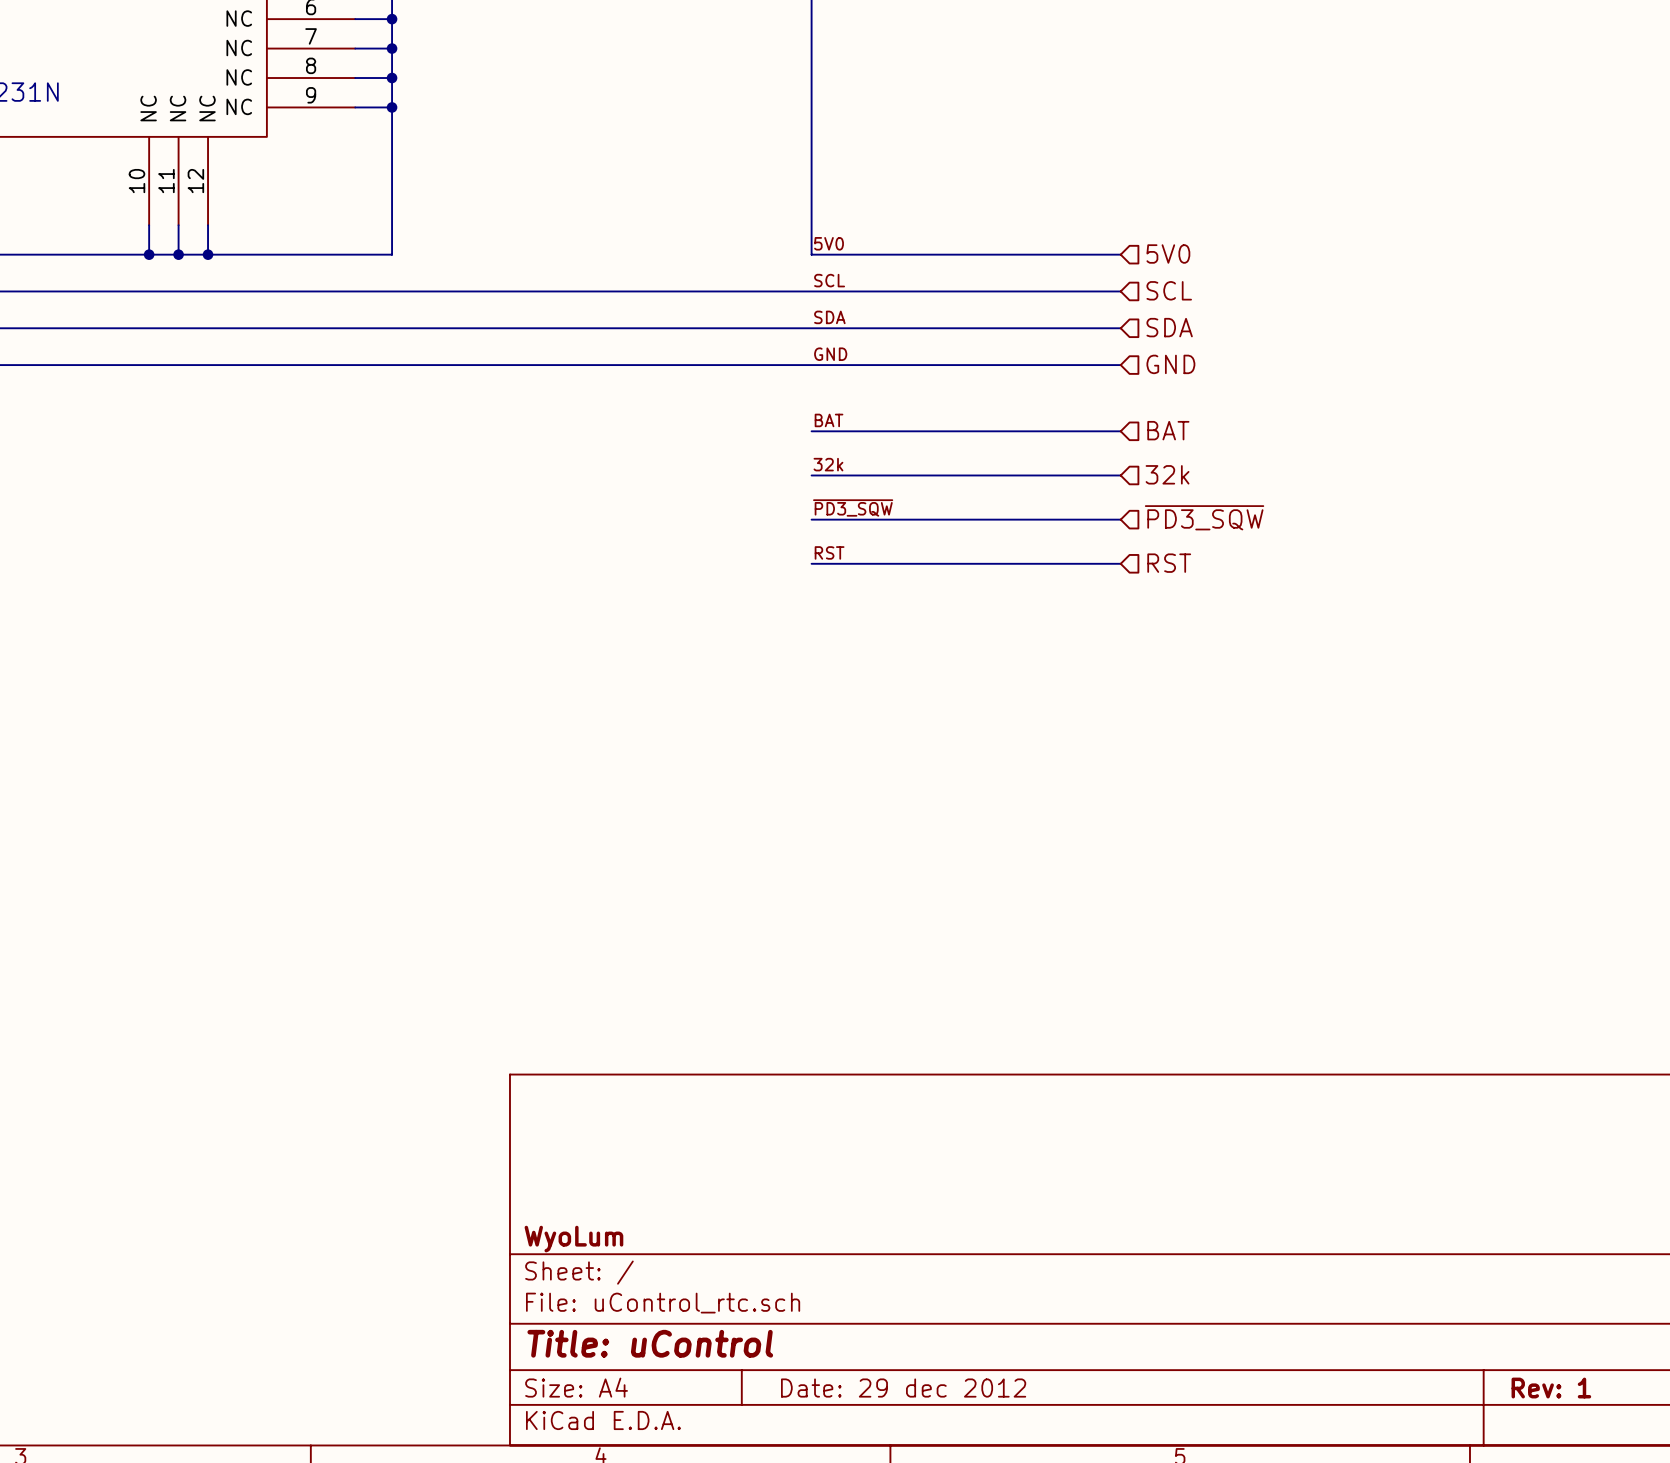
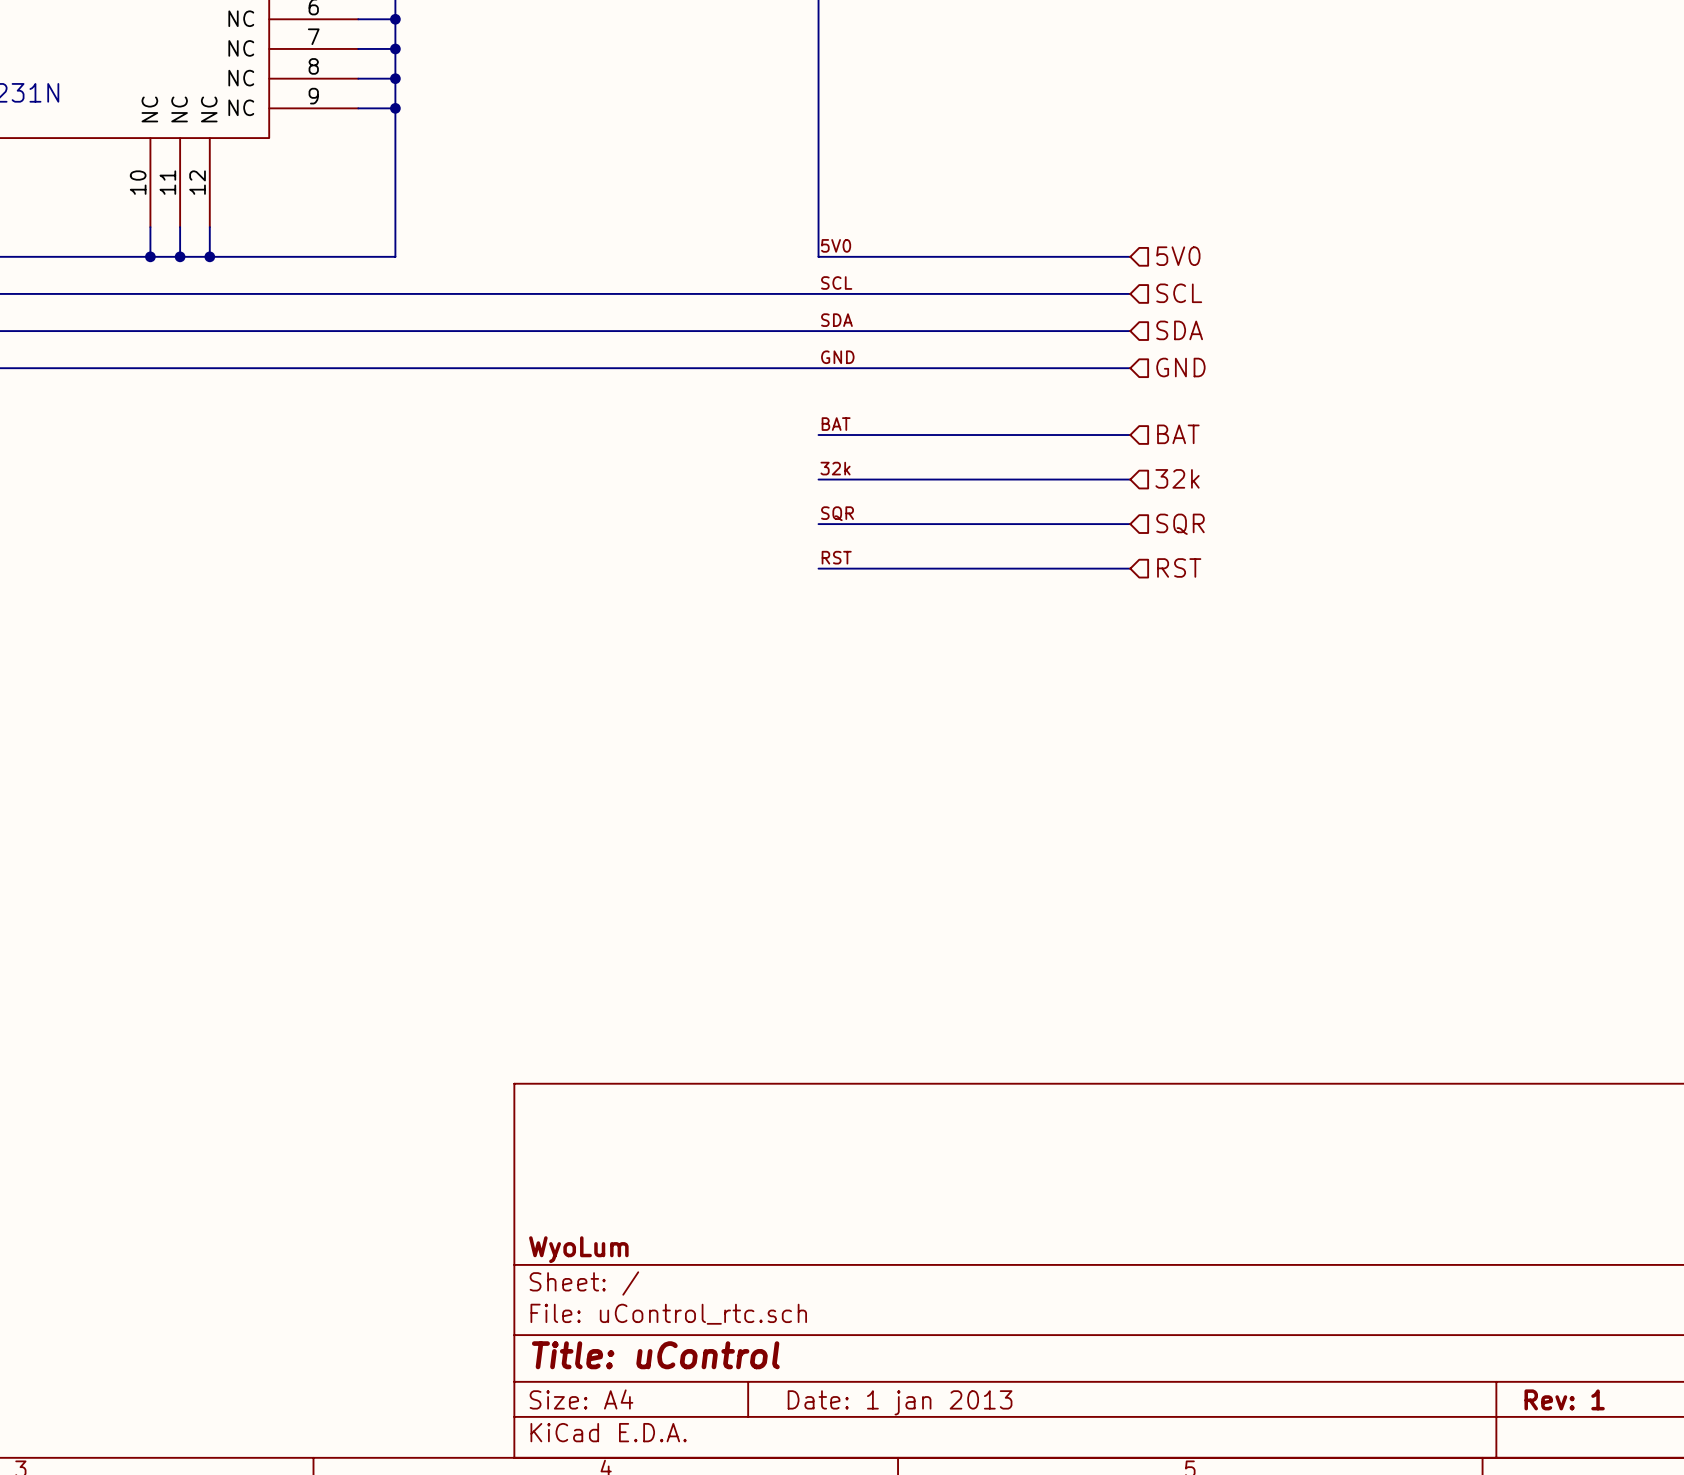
label: ~{PD3_SQW} (853, 507) -> SQR (837, 513)
hierarchical label: ~{PD3_SQW} (1204, 517) -> SQR (1180, 524)
title block: Date: 29 dec 2012 (903, 1388) -> Date: 1 jan 2013 (900, 1402)

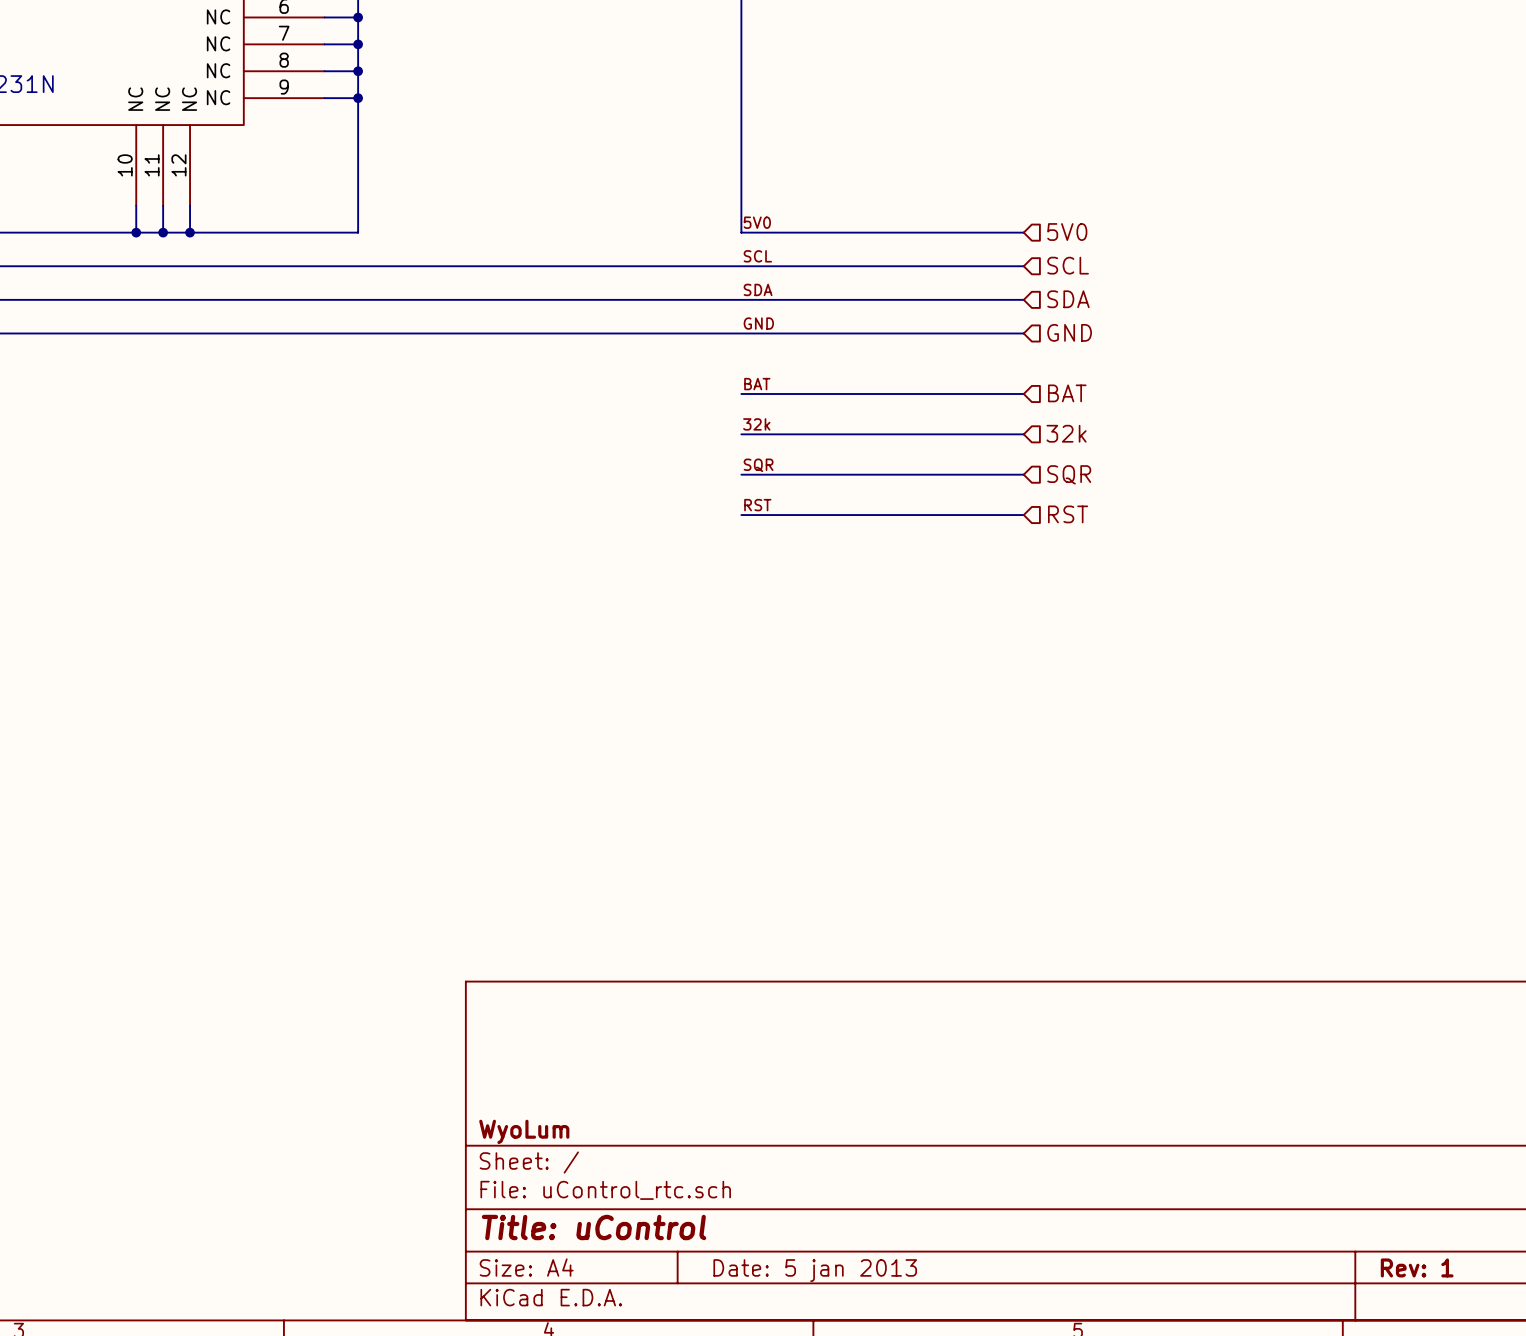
title block: Date: 1 jan 2013 (900, 1402) -> Date: 5 jan 2013 (815, 1270)

